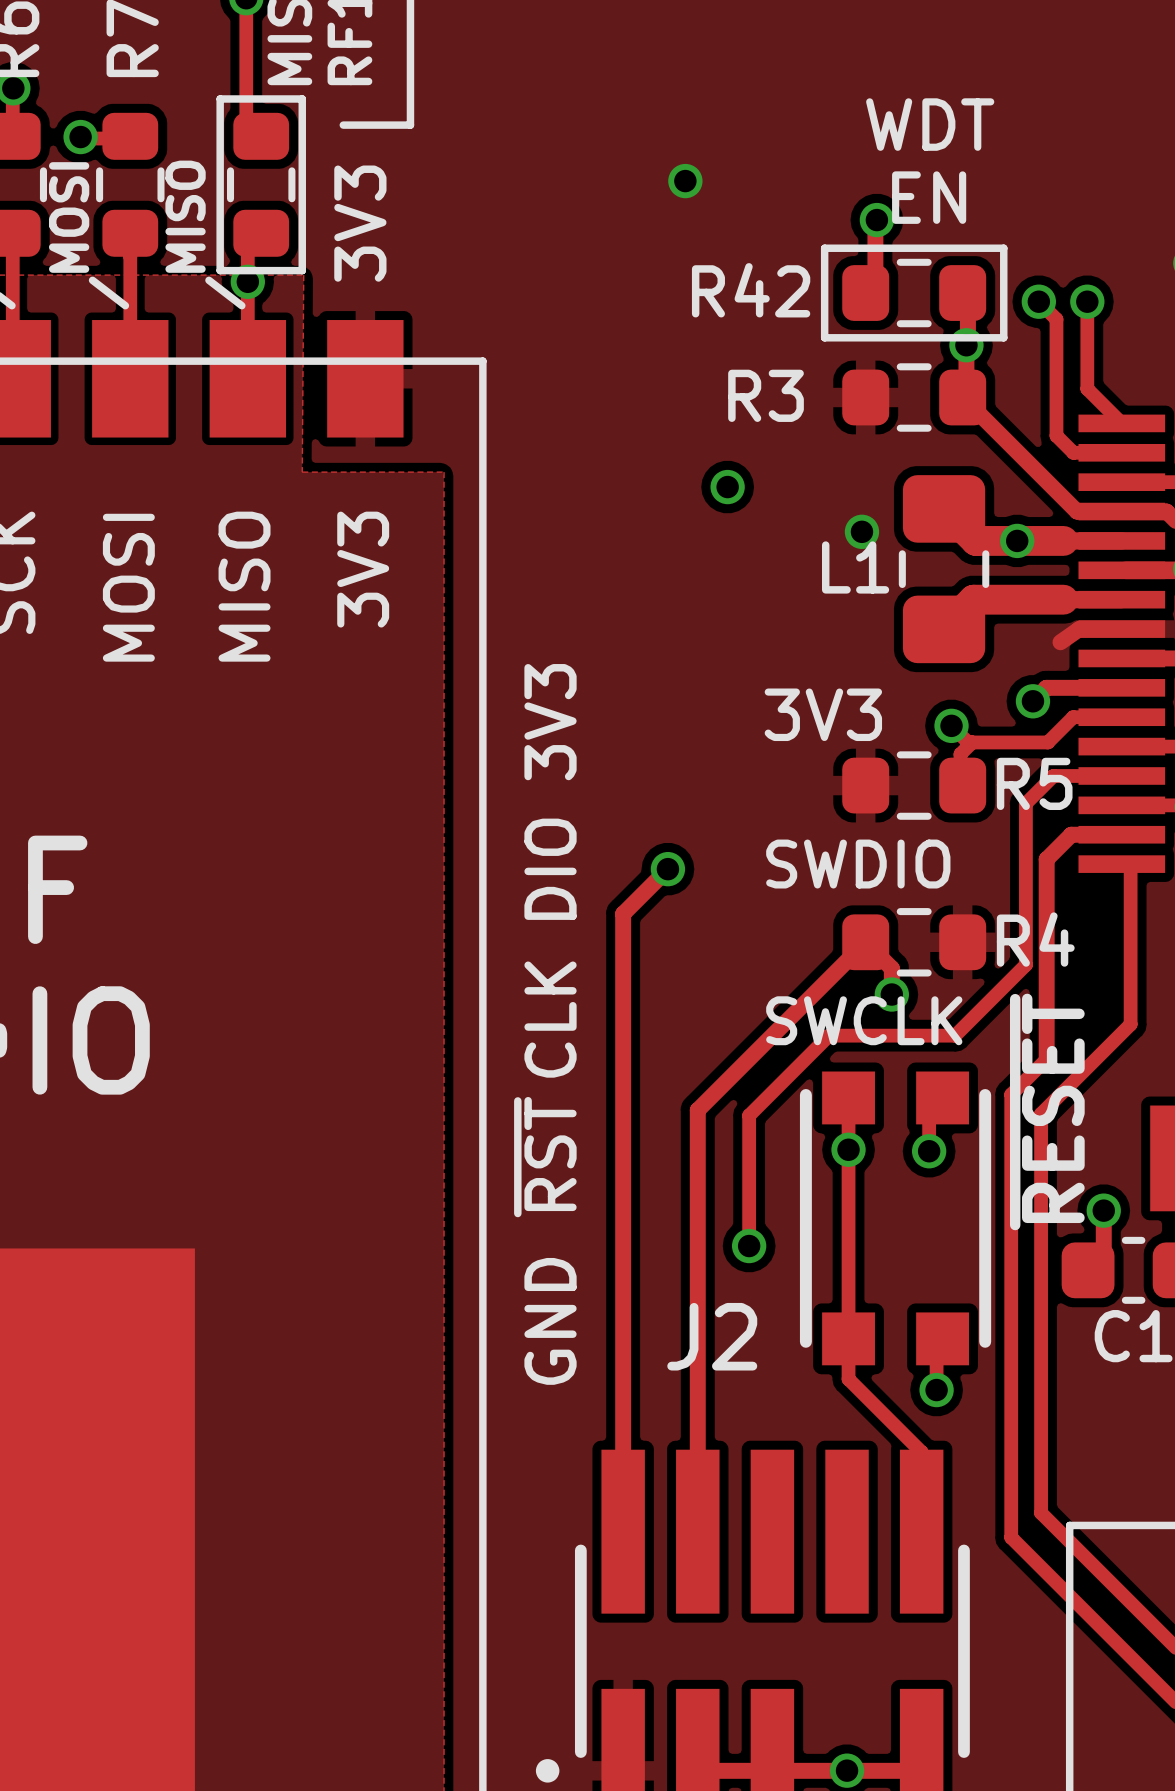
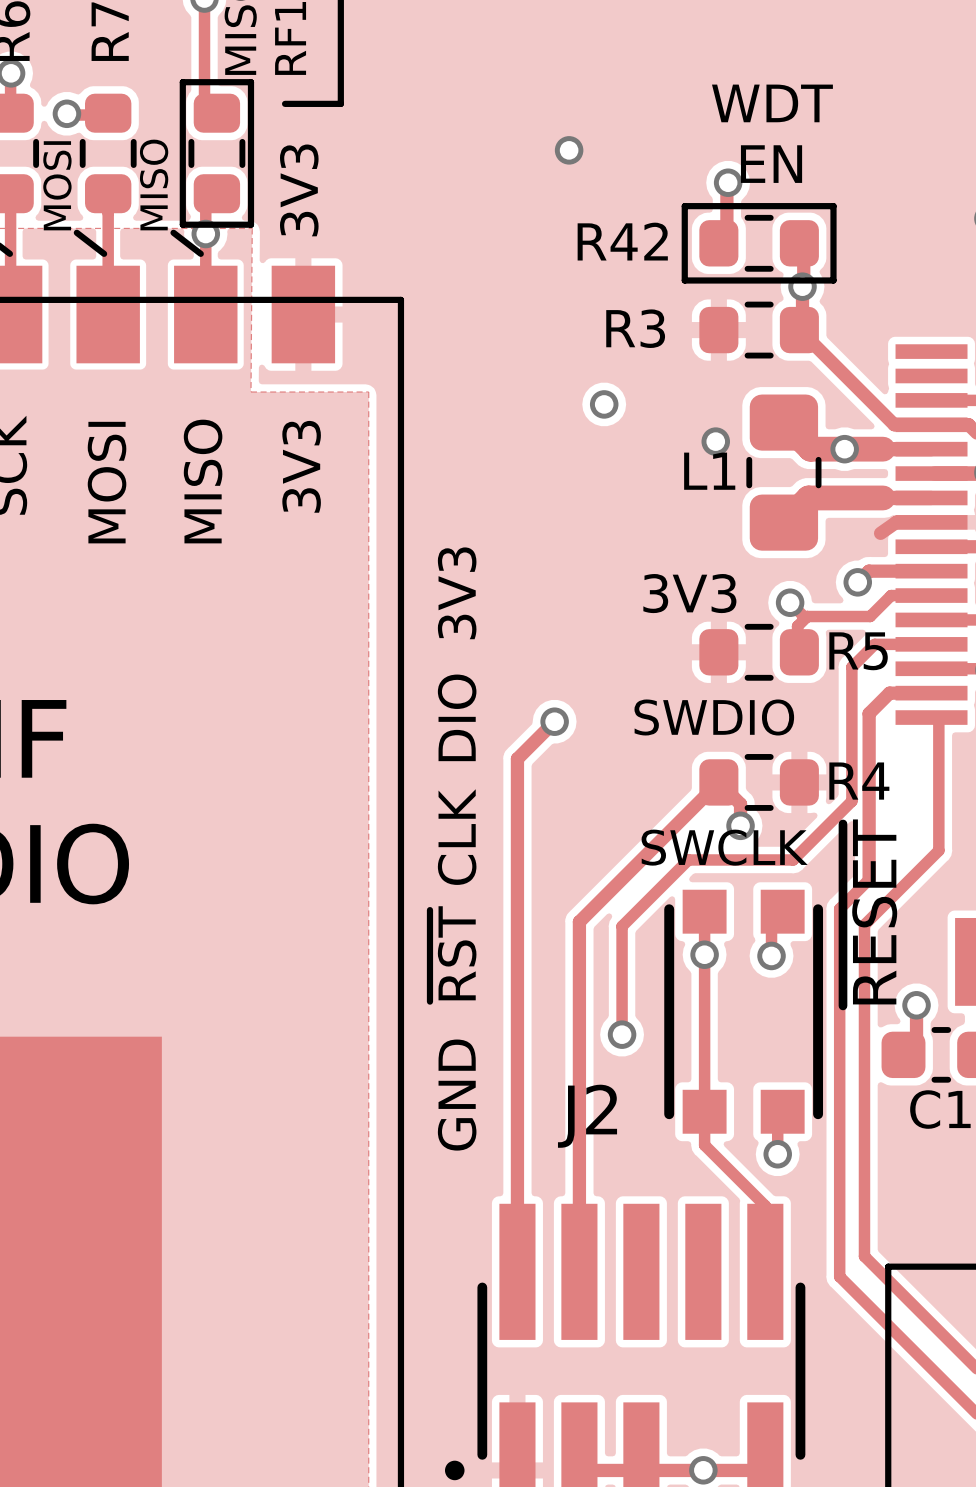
track: (1038, 301) (1056, 319) (1056, 435) (1073, 452) (1121, 452) -> none
via: (1038, 301) -> none
track: (1087, 301) (1087, 388) (1121, 423) -> none
via: (1087, 301) -> none

